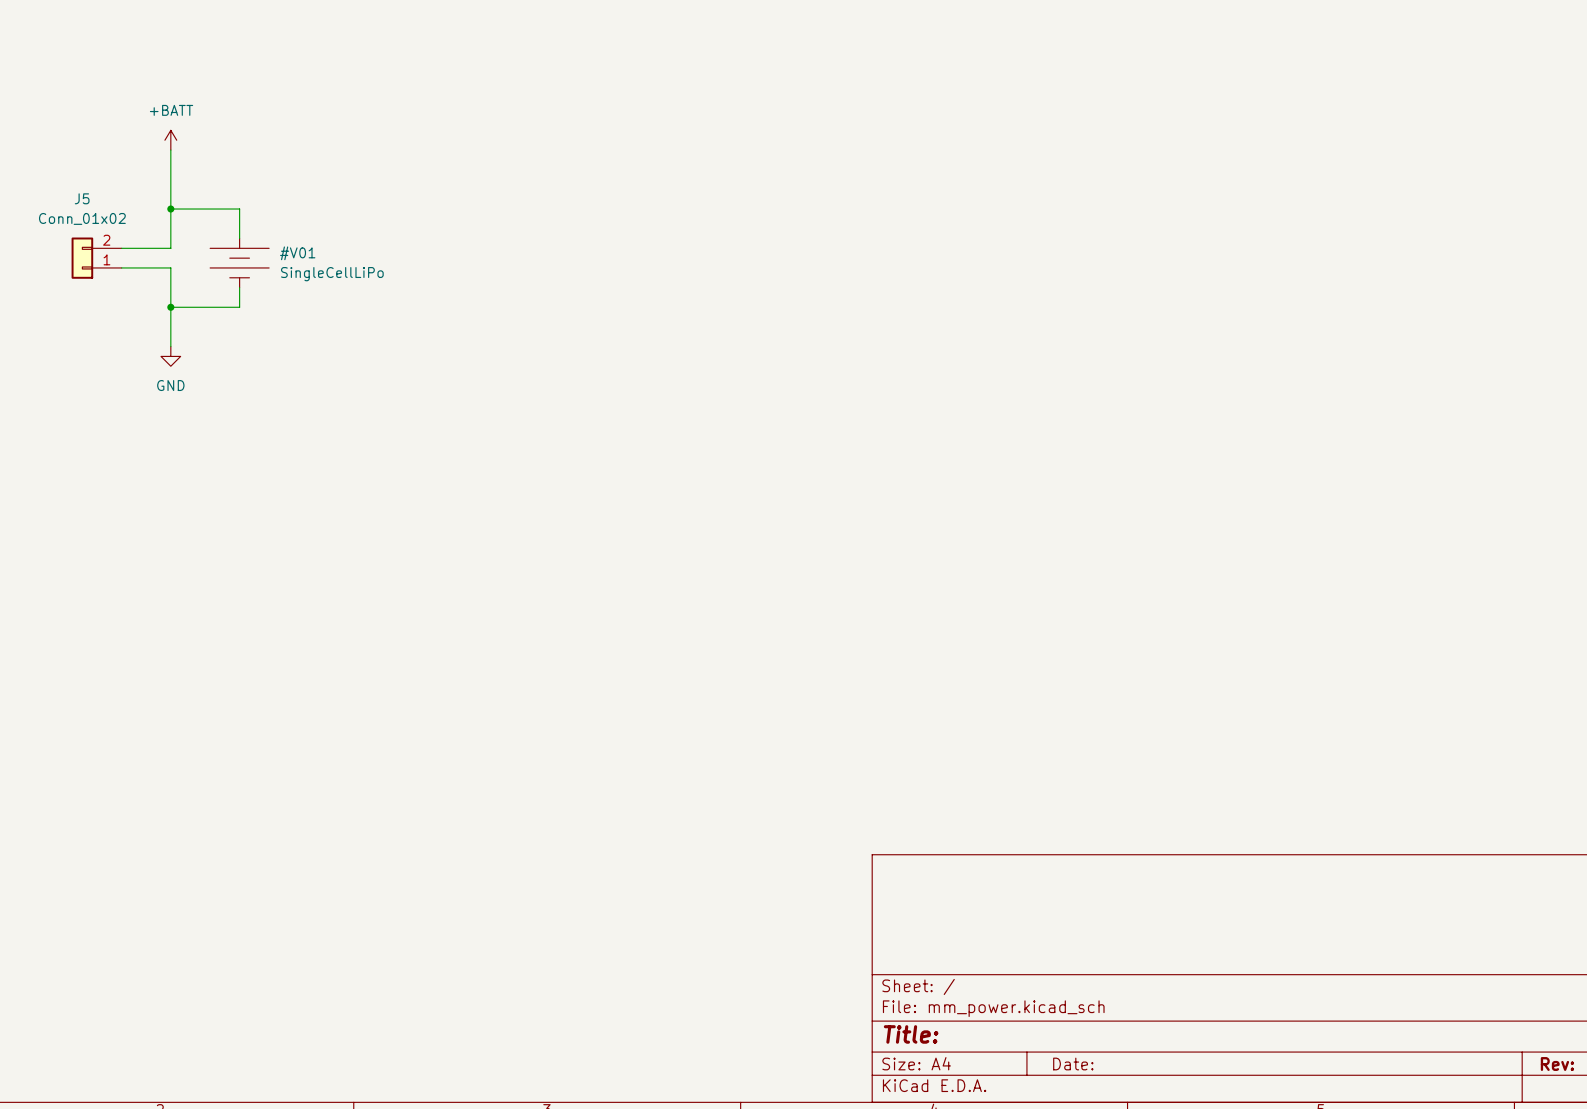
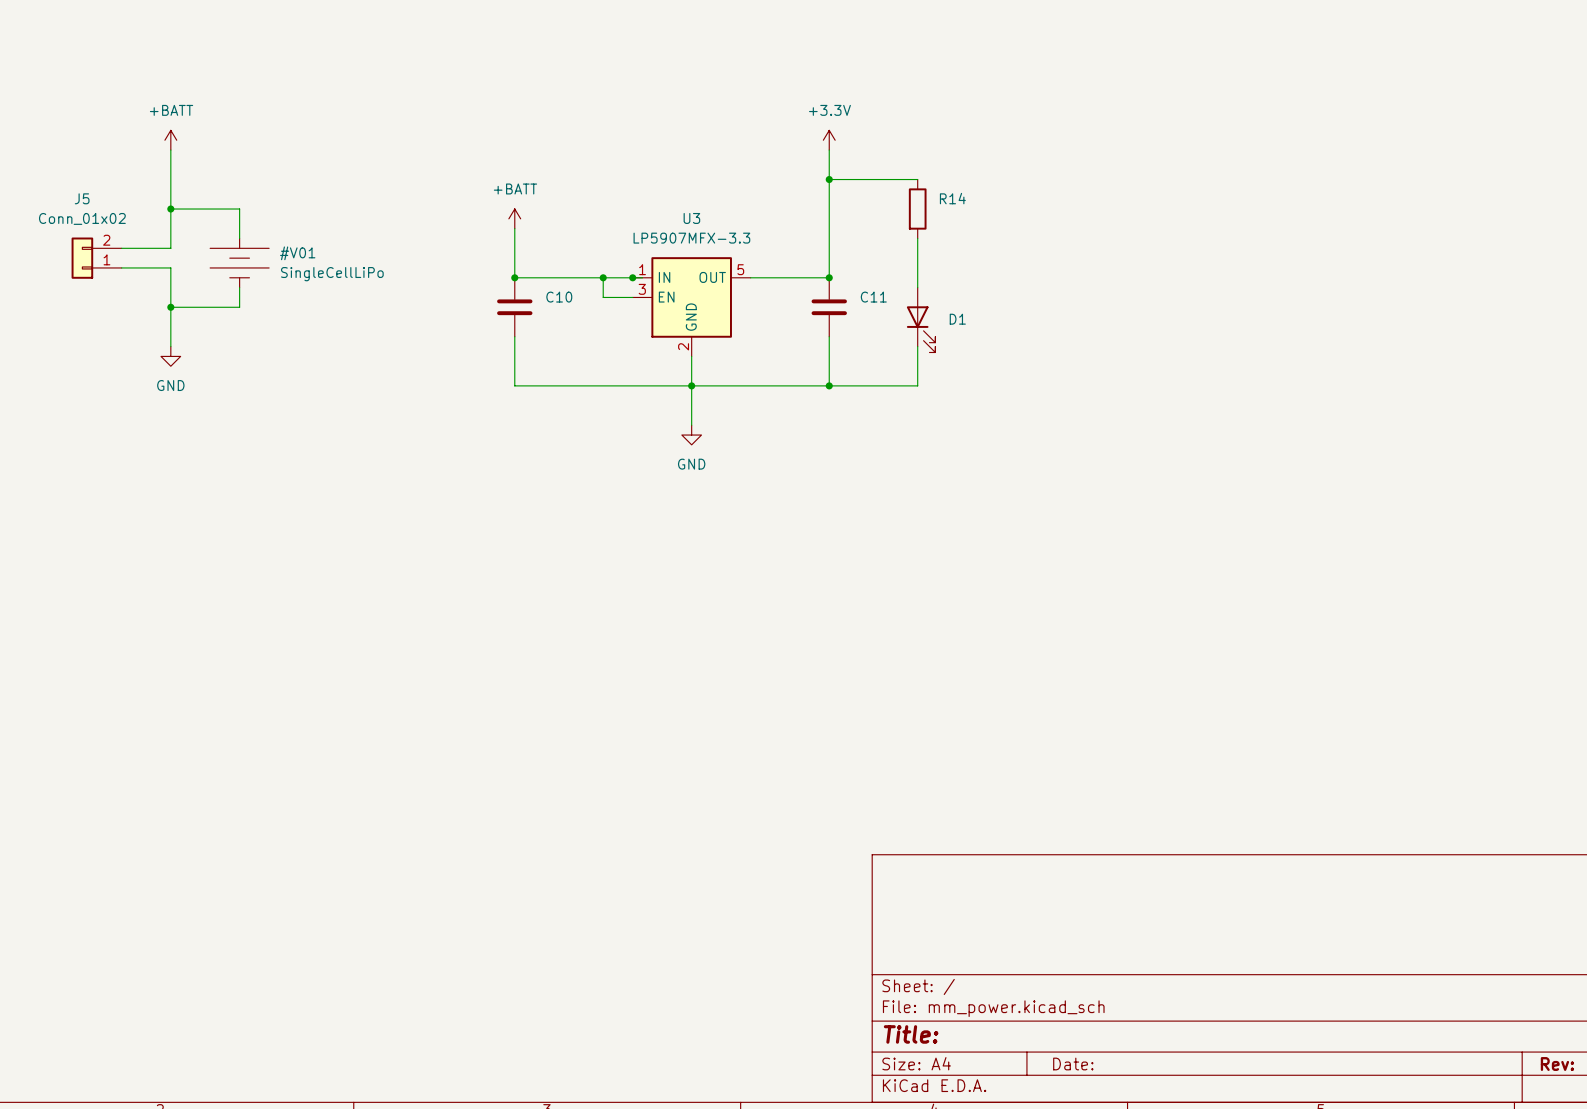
power symbol: none -> +3.3V (829, 140)
wire: none -> (829, 150) (829, 277) (750, 277)
wire: none -> (829, 179) (917, 179)
junction: none -> (829, 179)
R14: none -> (917, 209)
power symbol: none -> +BATT (514, 218)
wire: none -> (514, 228) (514, 277) (642, 277)
wire: none -> (917, 238) (917, 287)
junction: none -> (514, 277)
wire: none -> (603, 277) (603, 297) (632, 297)
junction: none -> (603, 277)
junction: none -> (632, 277)
junction: none -> (829, 277)
U3: none -> LP5907MFX-3.3 (691, 306)
C10: none -> (514, 307)
C11: none -> (829, 307)
D1: none -> (921, 320)
wire: none -> (514, 336) (514, 385) (917, 385) (917, 346)
wire: none -> (829, 336) (829, 385)
wire: none -> (691, 356) (691, 425)
junction: none -> (691, 385)
junction: none -> (829, 385)
power symbol: none -> GND (691, 435)

